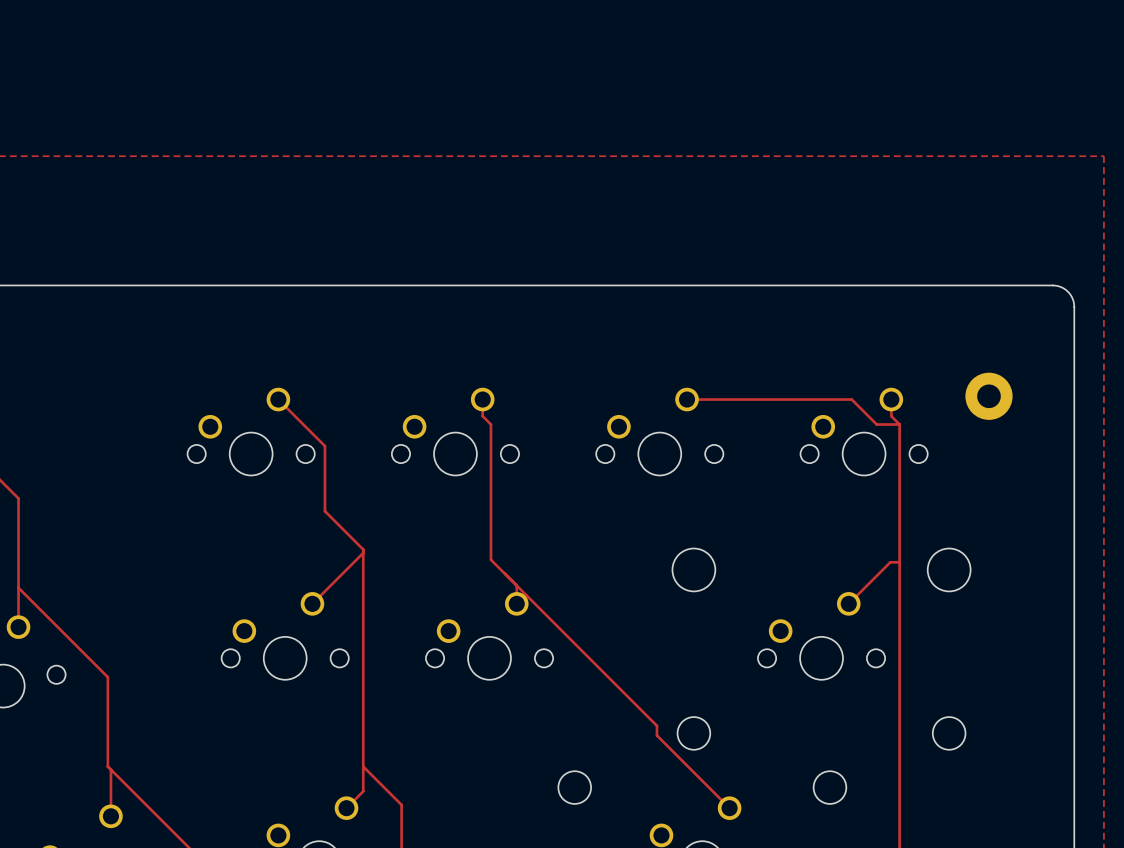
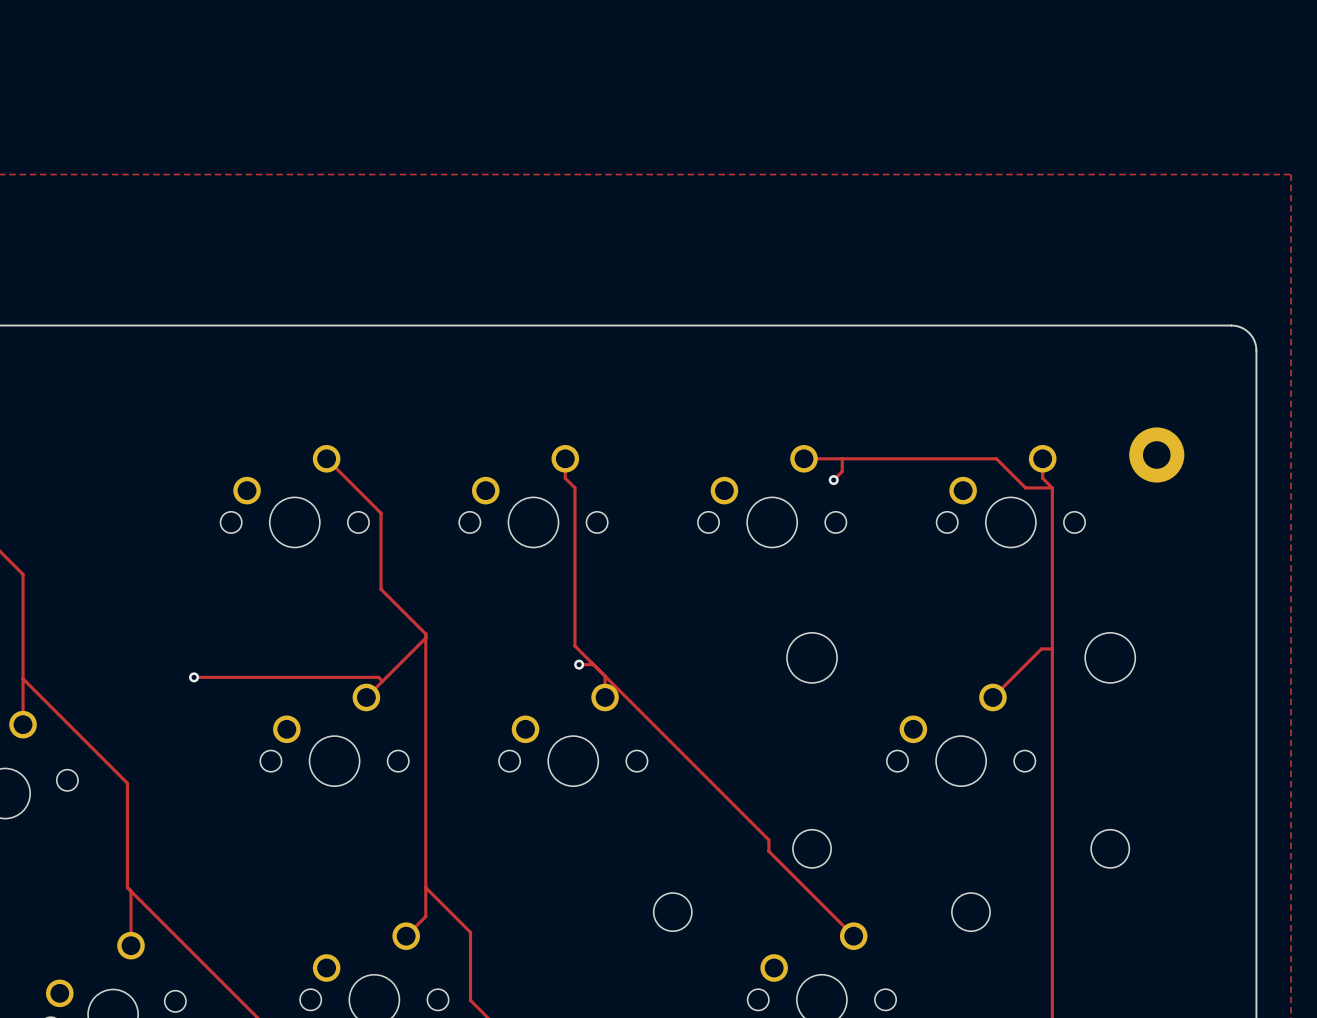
track: none -> (842, 458) (842, 471) (833, 480)
via: none -> (833, 480)
track: none -> (579, 664) (593, 664)
via: none -> (579, 664)
track: none -> (194, 677) (378, 677) (382, 681)
via: none -> (194, 677)

